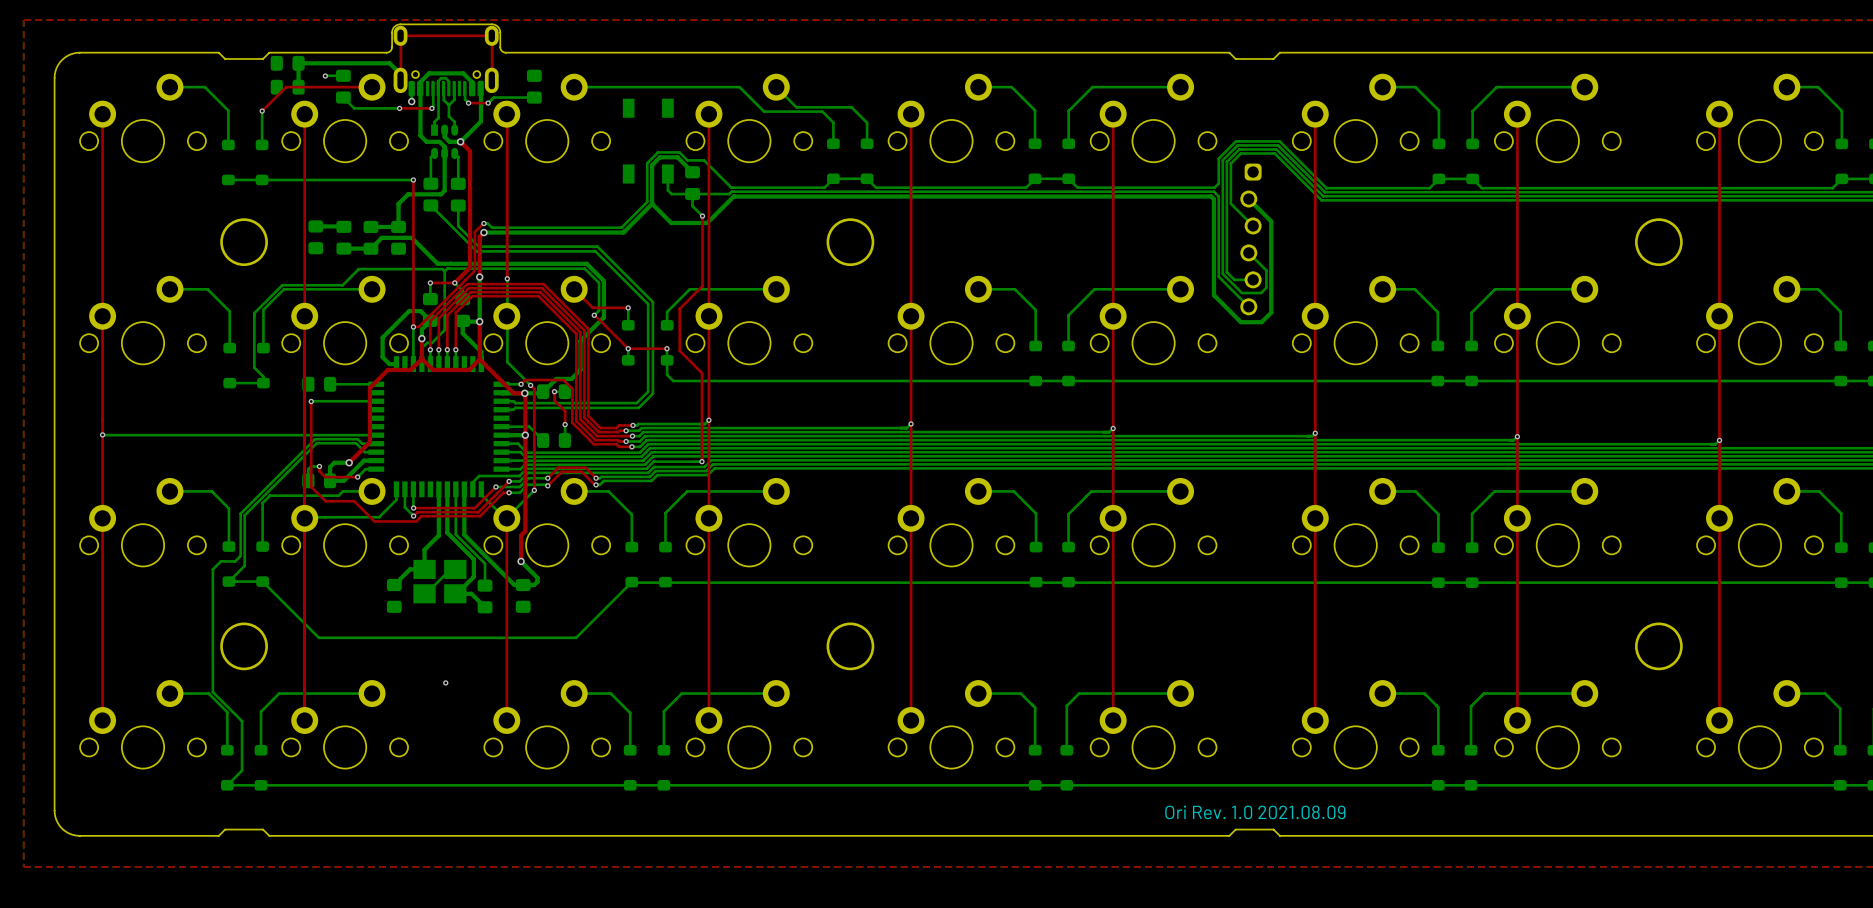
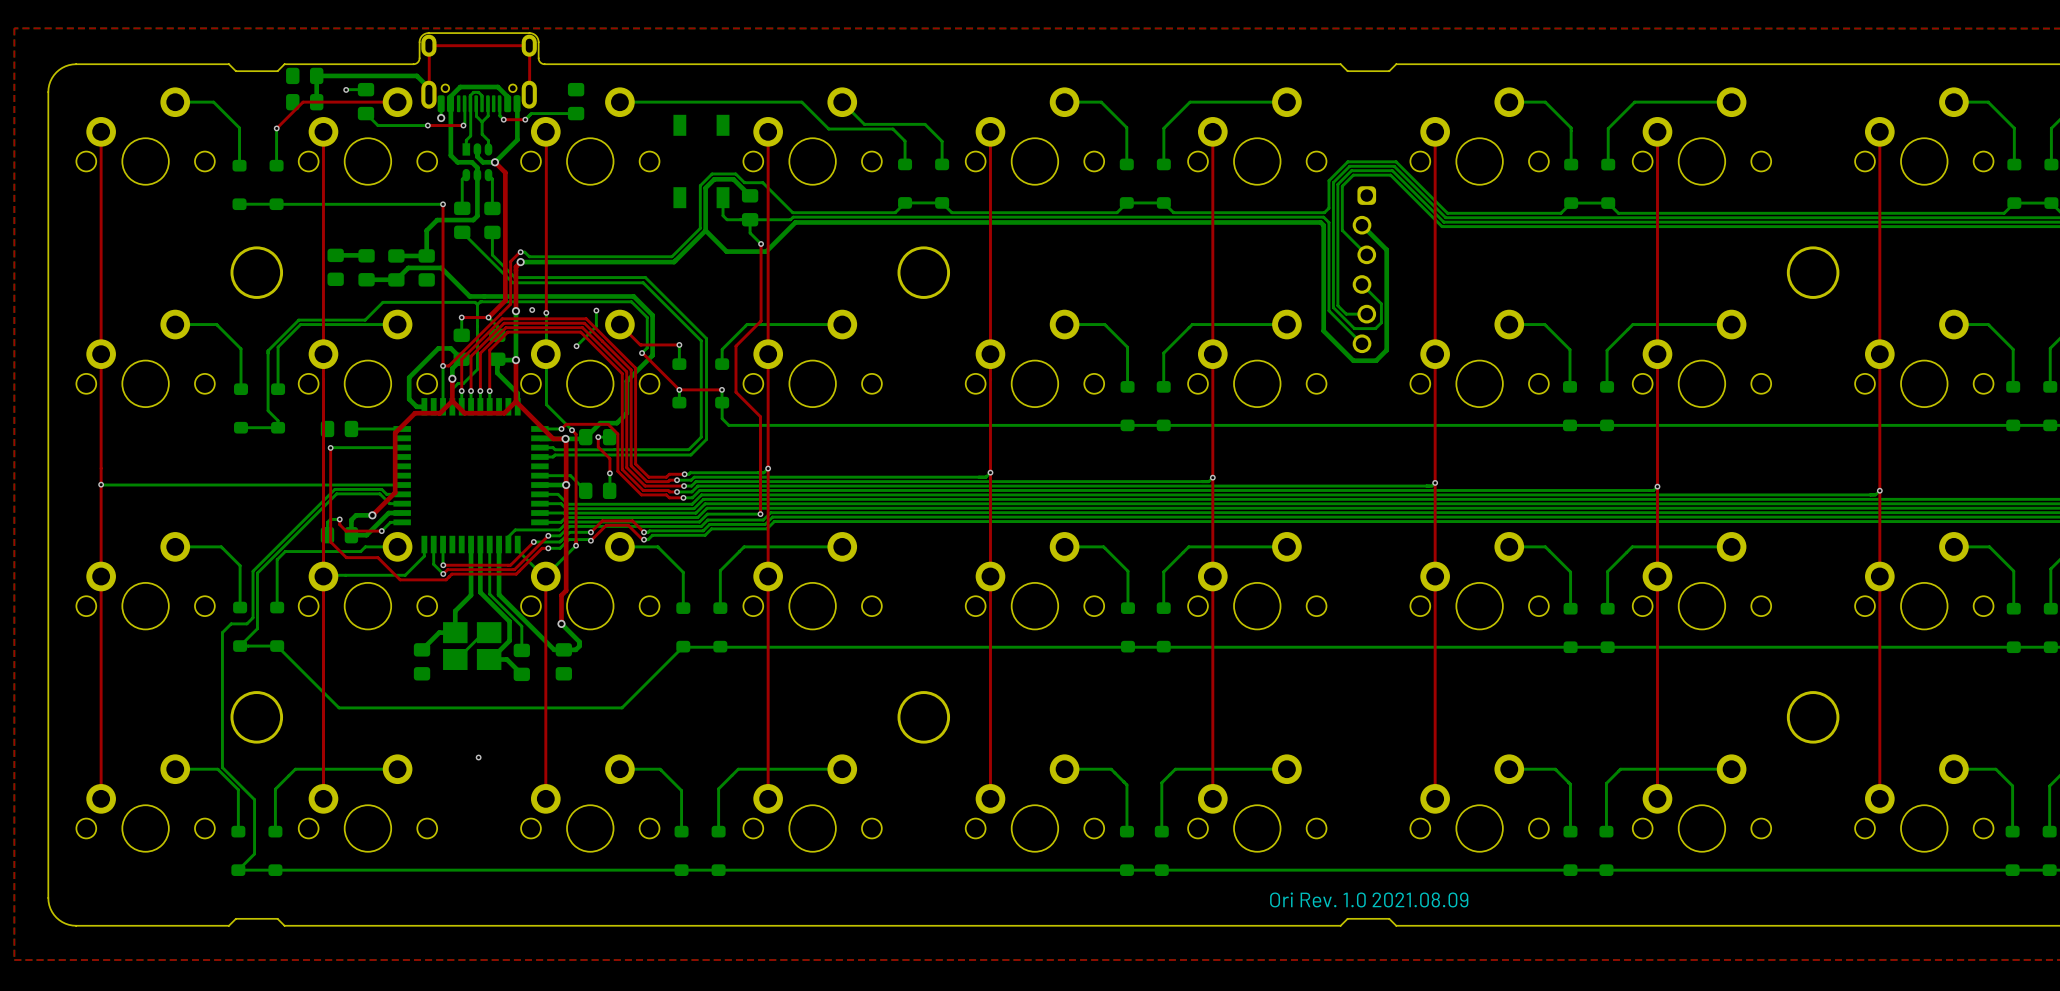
via: none -> (532, 310)
bottom track: none -> (596, 310) (596, 326) (576, 346)
via: none -> (596, 310)
via: none -> (576, 346)

